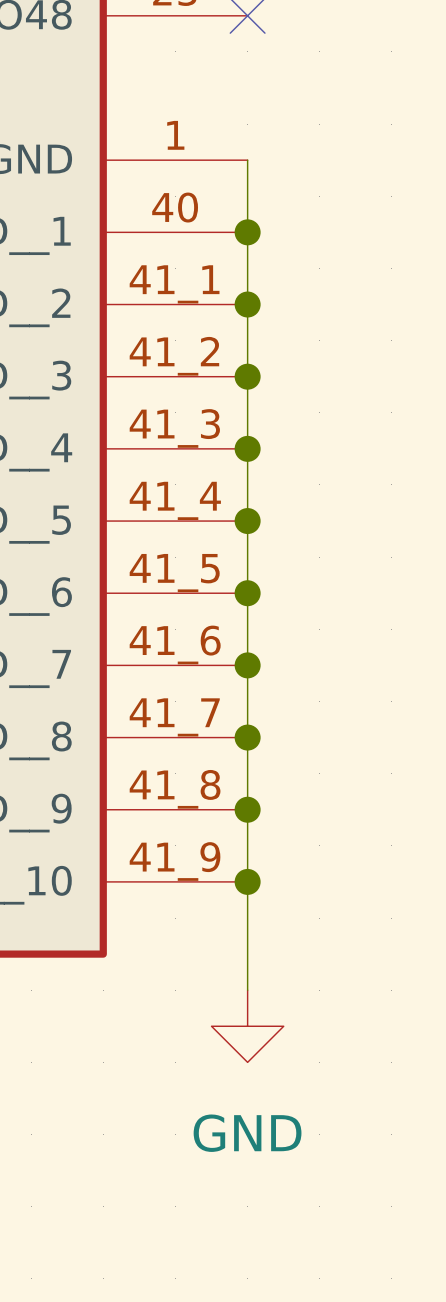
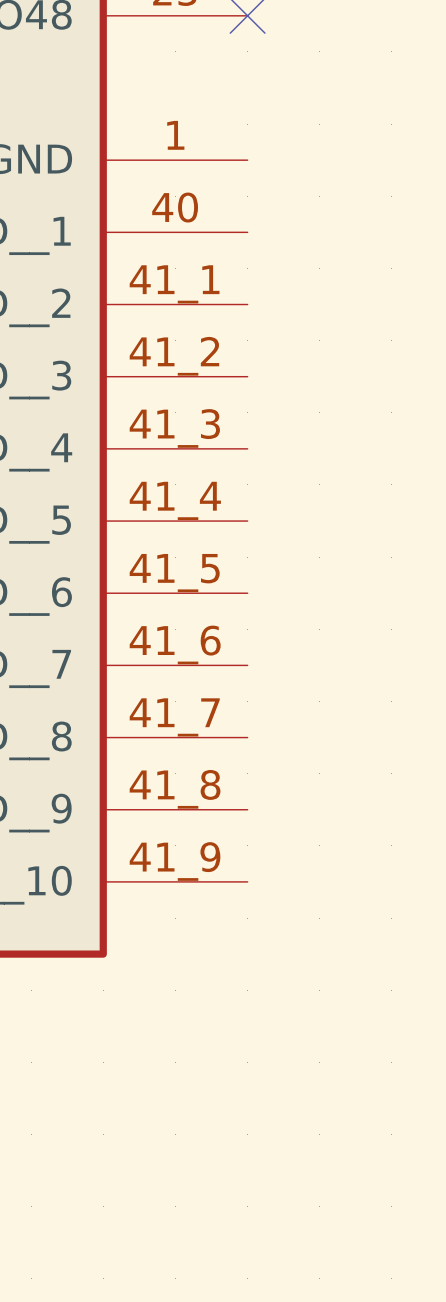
wire: (247, 160) (247, 990) -> none
junction: (247, 232) -> none
junction: (247, 304) -> none
junction: (247, 376) -> none
junction: (247, 448) -> none
junction: (247, 521) -> none
junction: (247, 593) -> none
junction: (247, 665) -> none
junction: (247, 737) -> none
junction: (247, 809) -> none
junction: (247, 881) -> none
power symbol: GND (247, 1026) -> none

